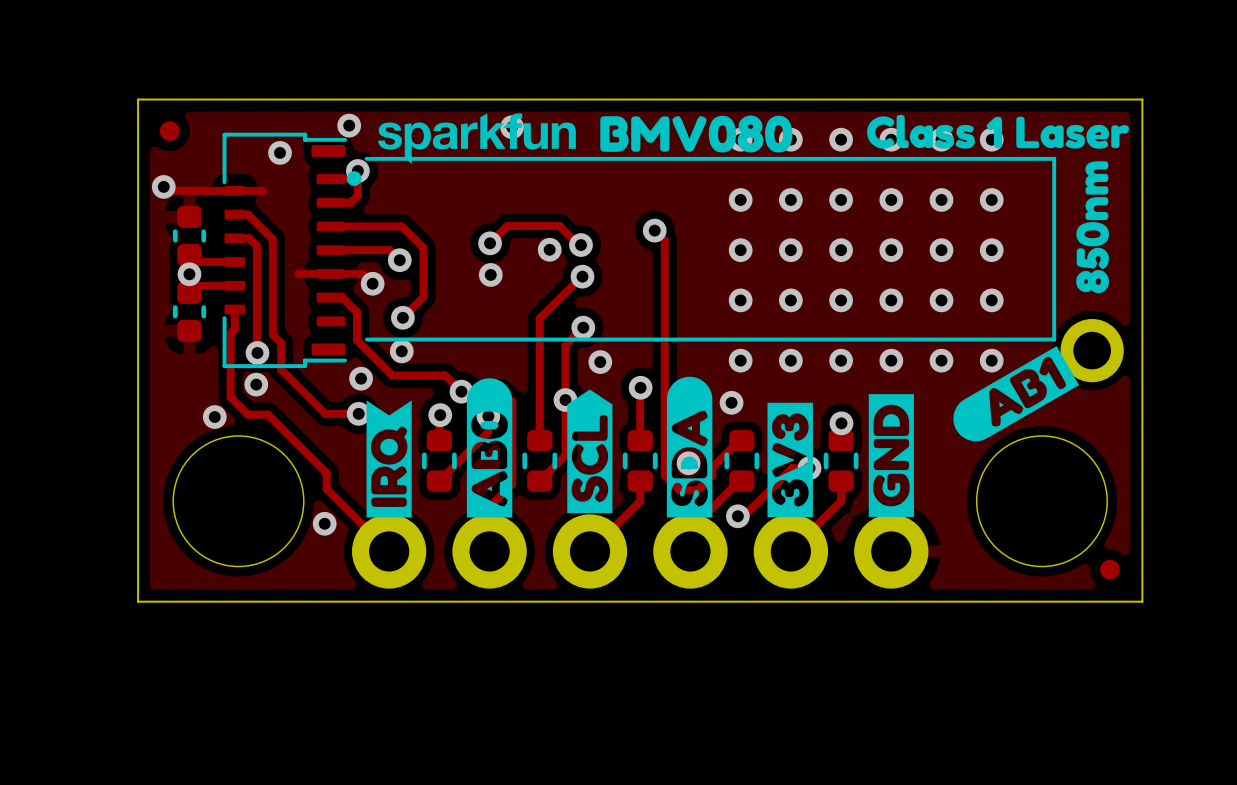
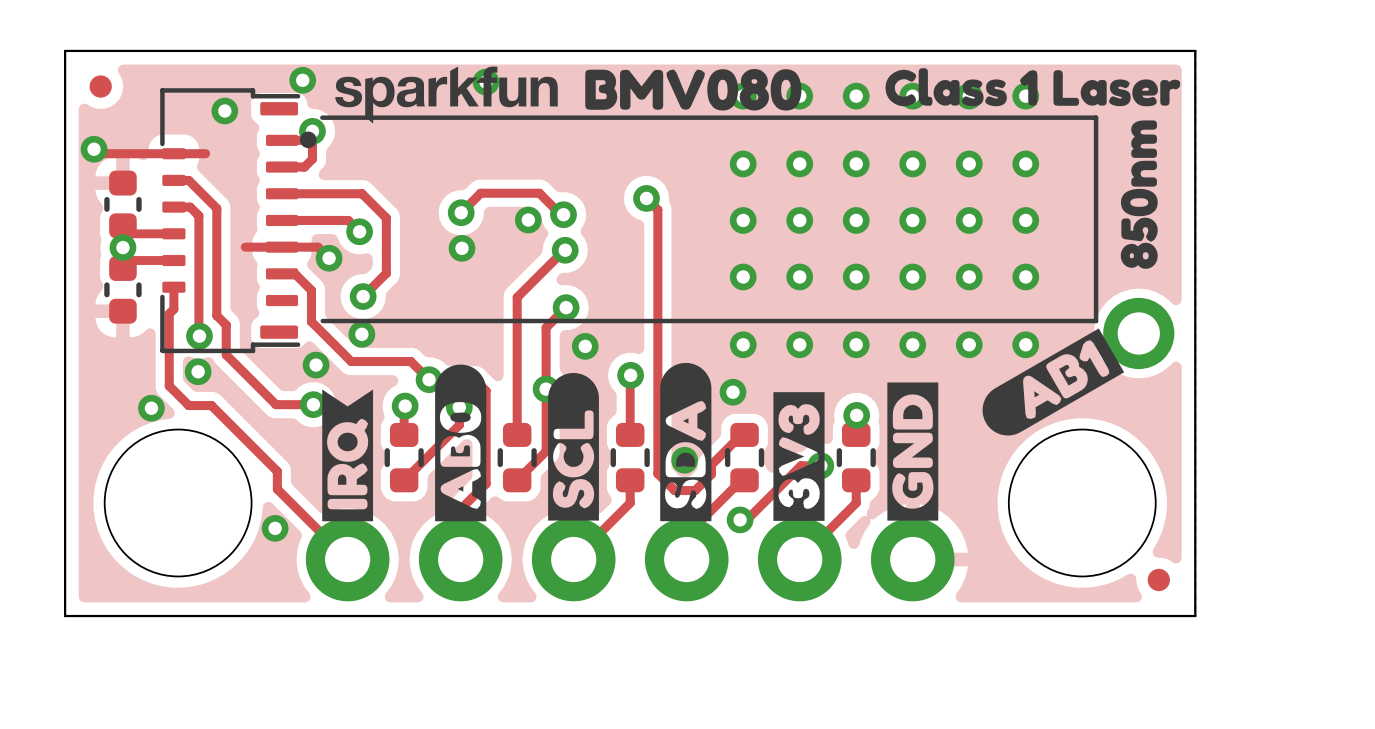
drawing shape: [567, 389, 613, 514] -> [548, 372, 599, 521]

